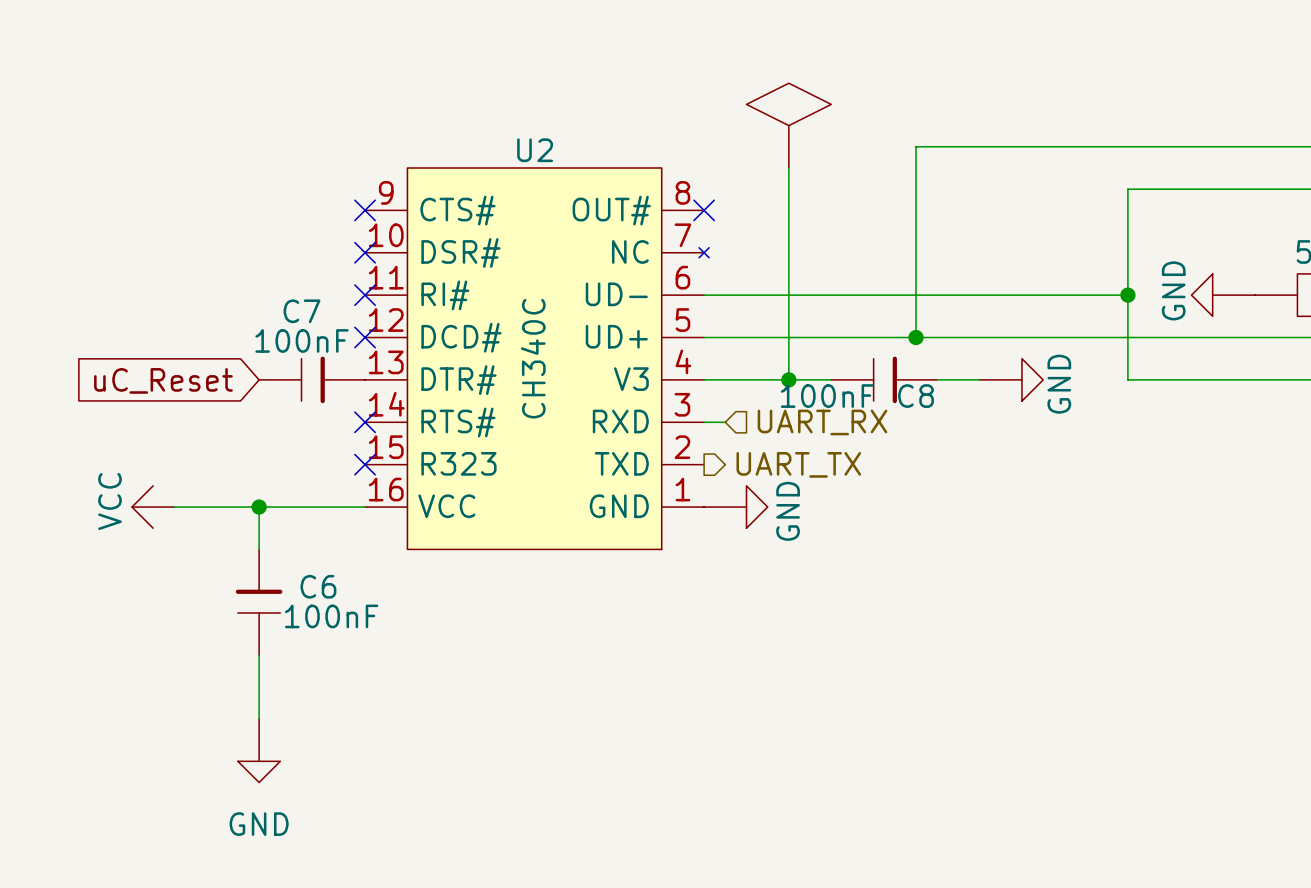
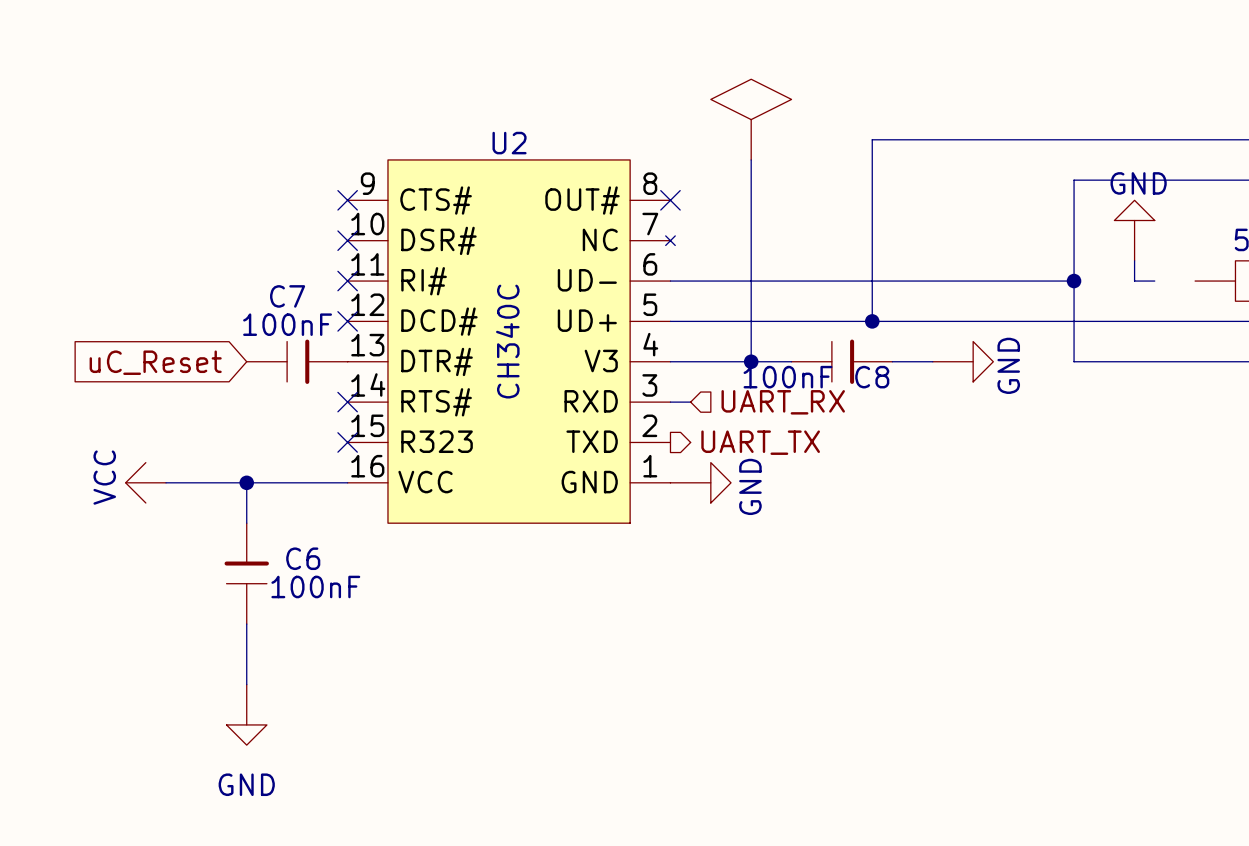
wire: none -> (1134, 260) (1134, 281) (1154, 281)
power symbol rotation: 0° (1202, 295) -> 90° clockwise (1134, 210)
power symbol position: GND (1223, 295) -> GND (1134, 230)

